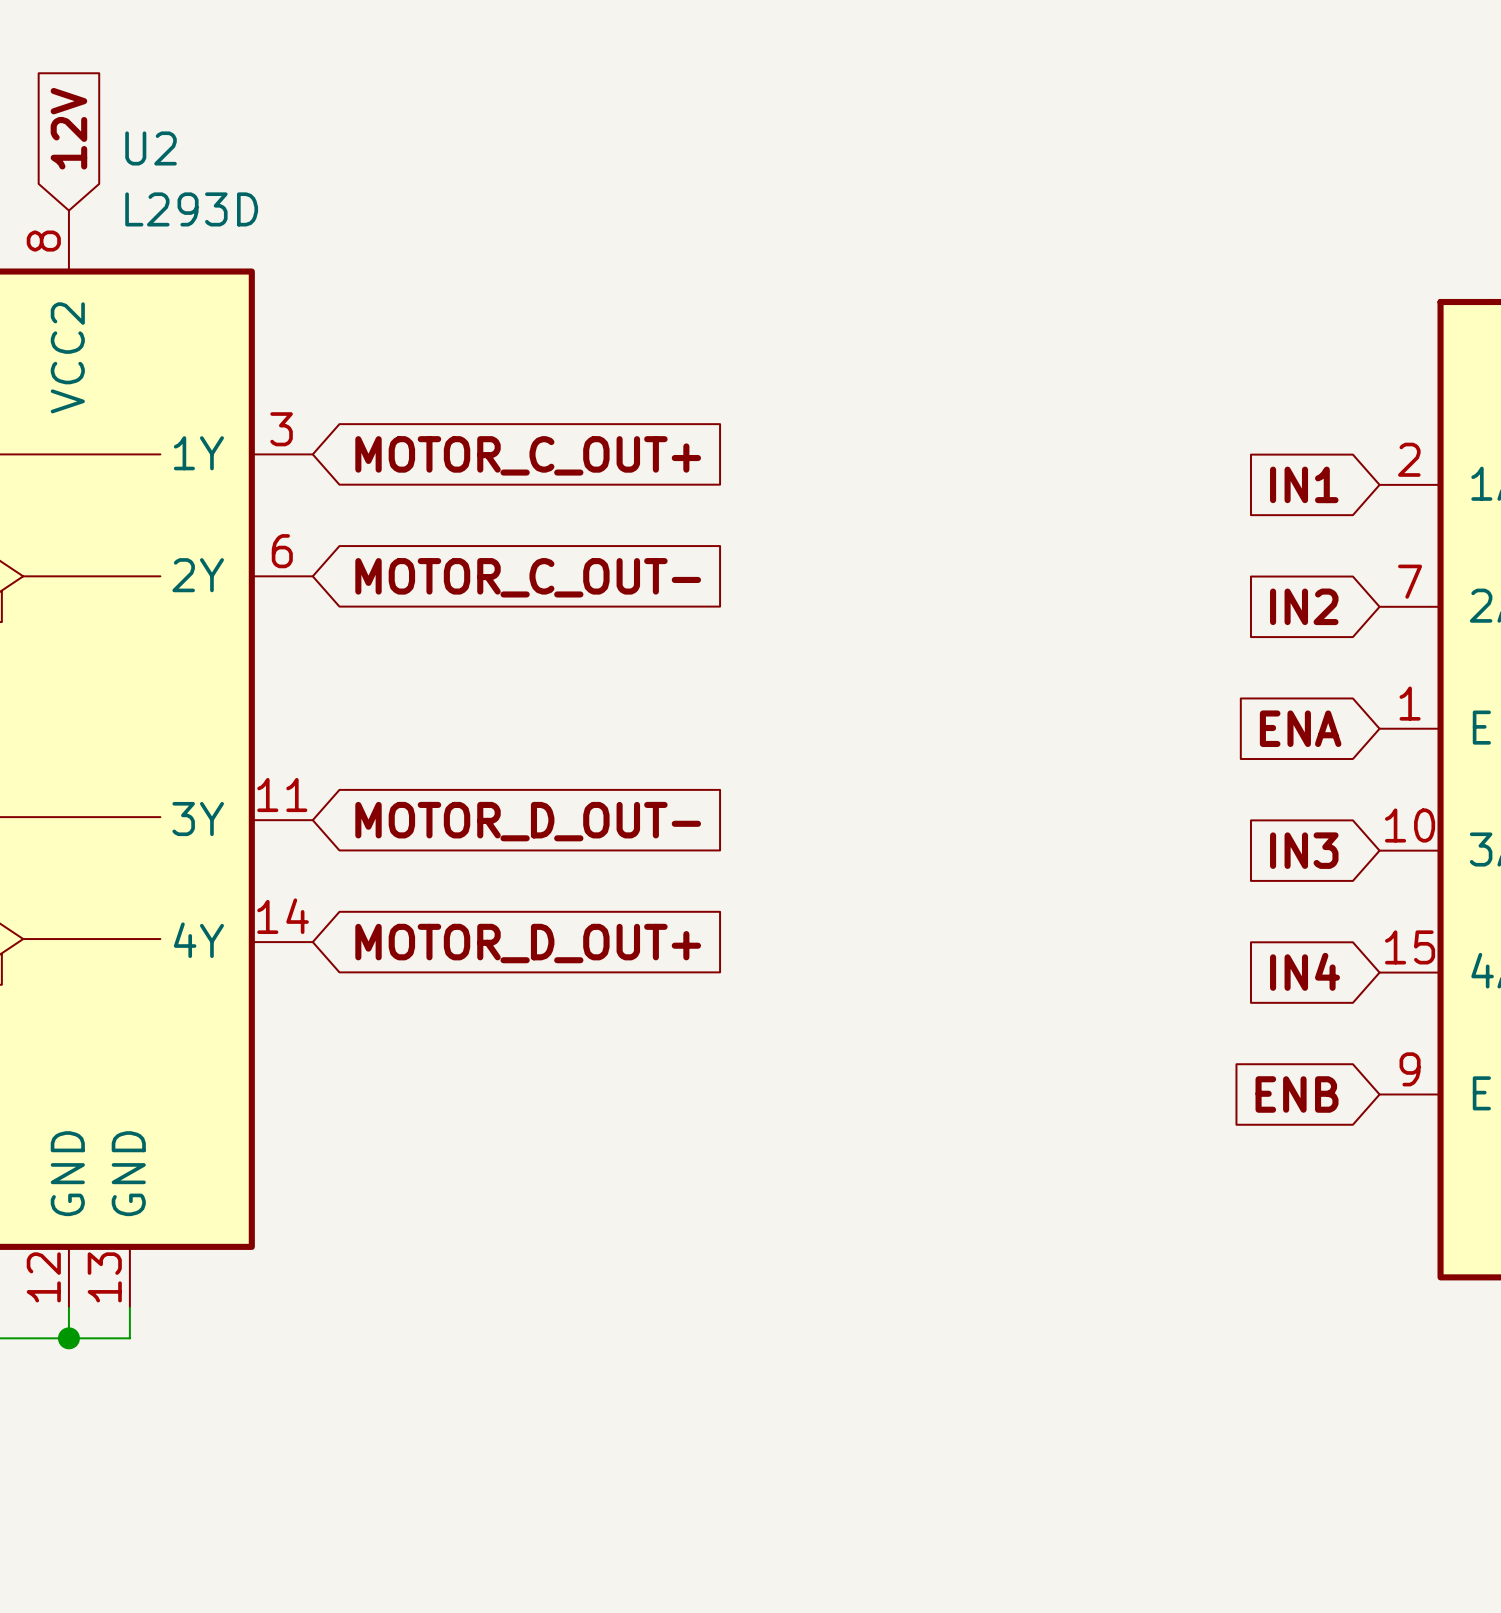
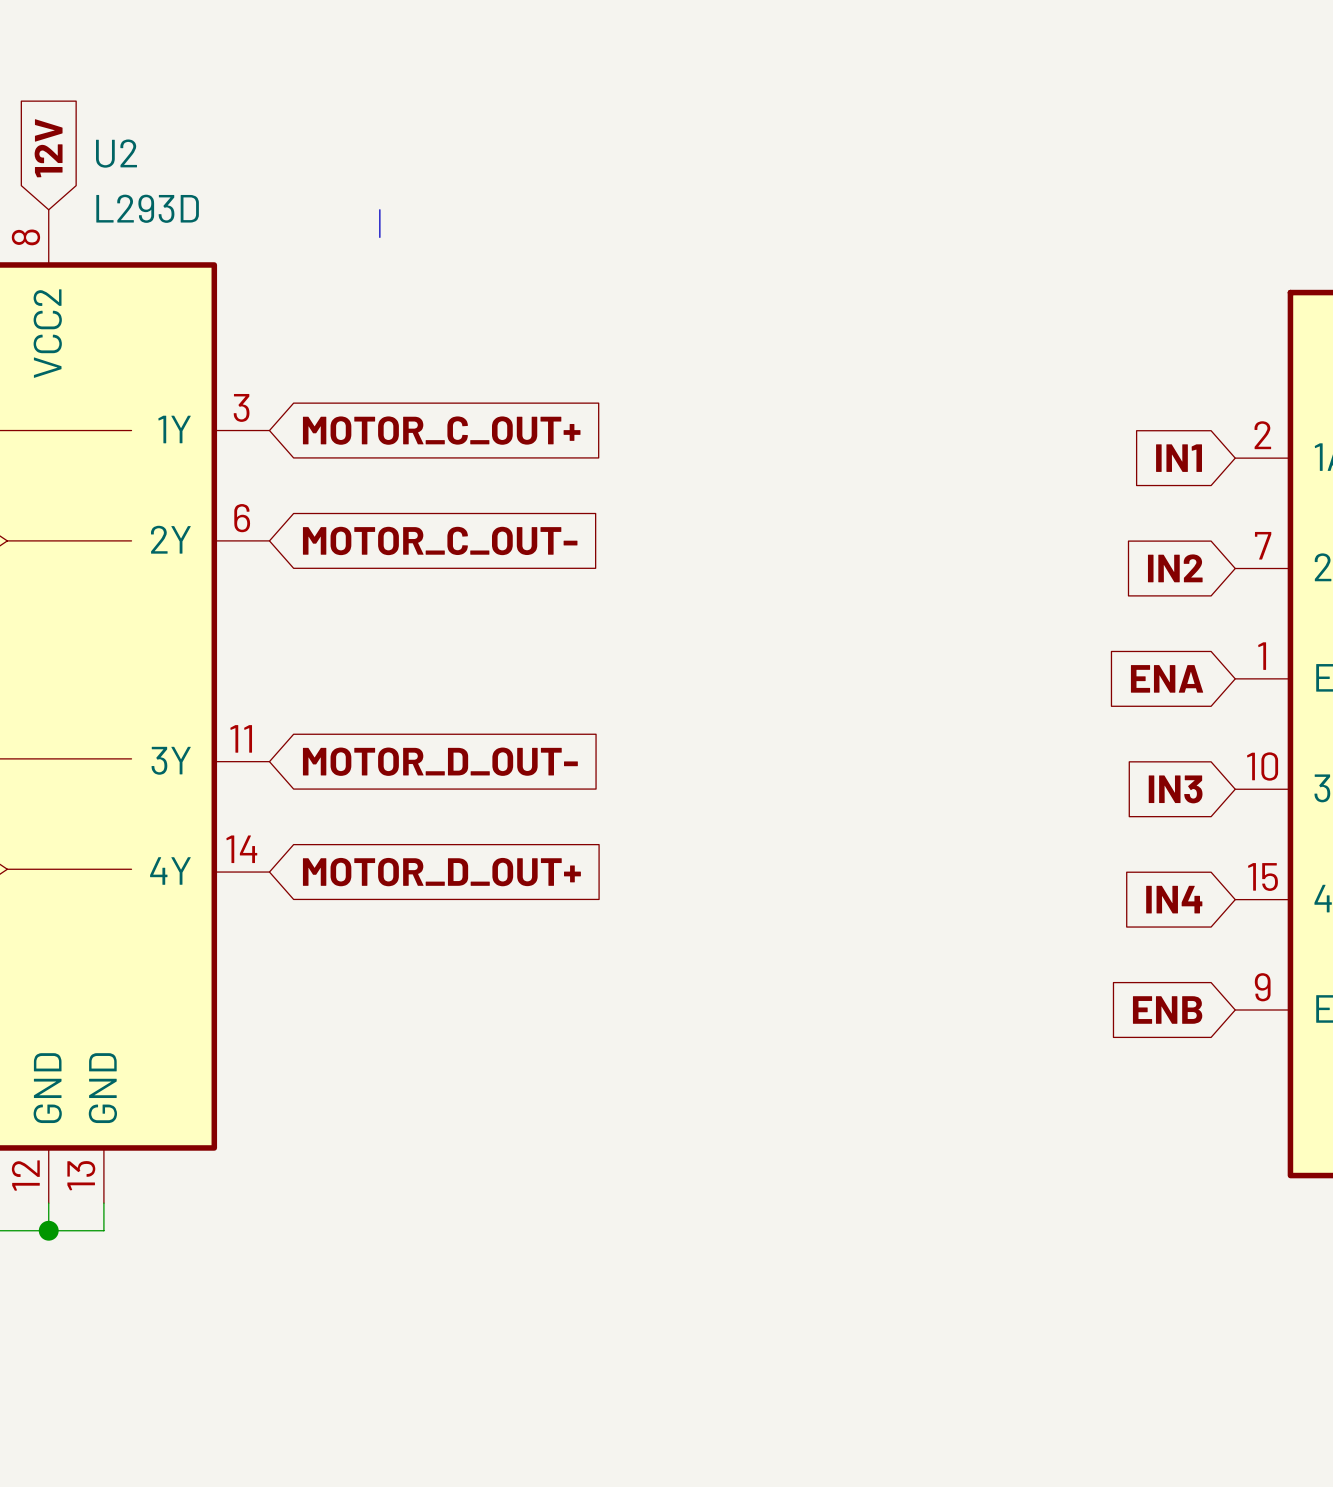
line: none -> (379, 209) (379, 237)

